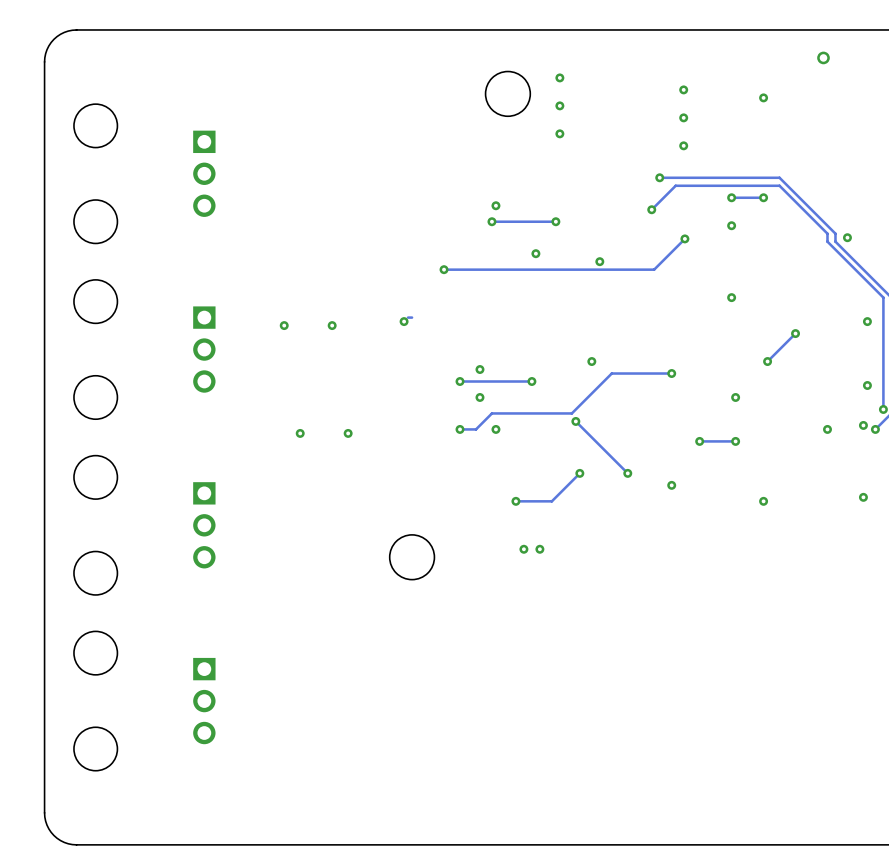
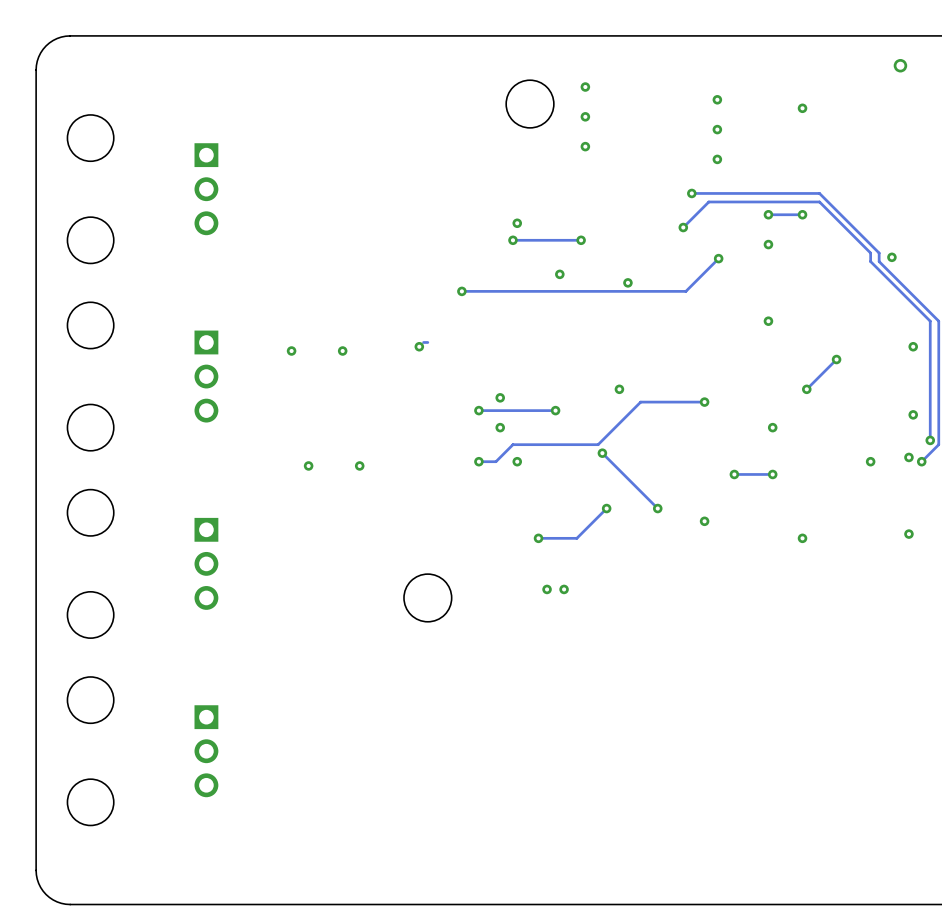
via position: (823, 57) -> (900, 65)

